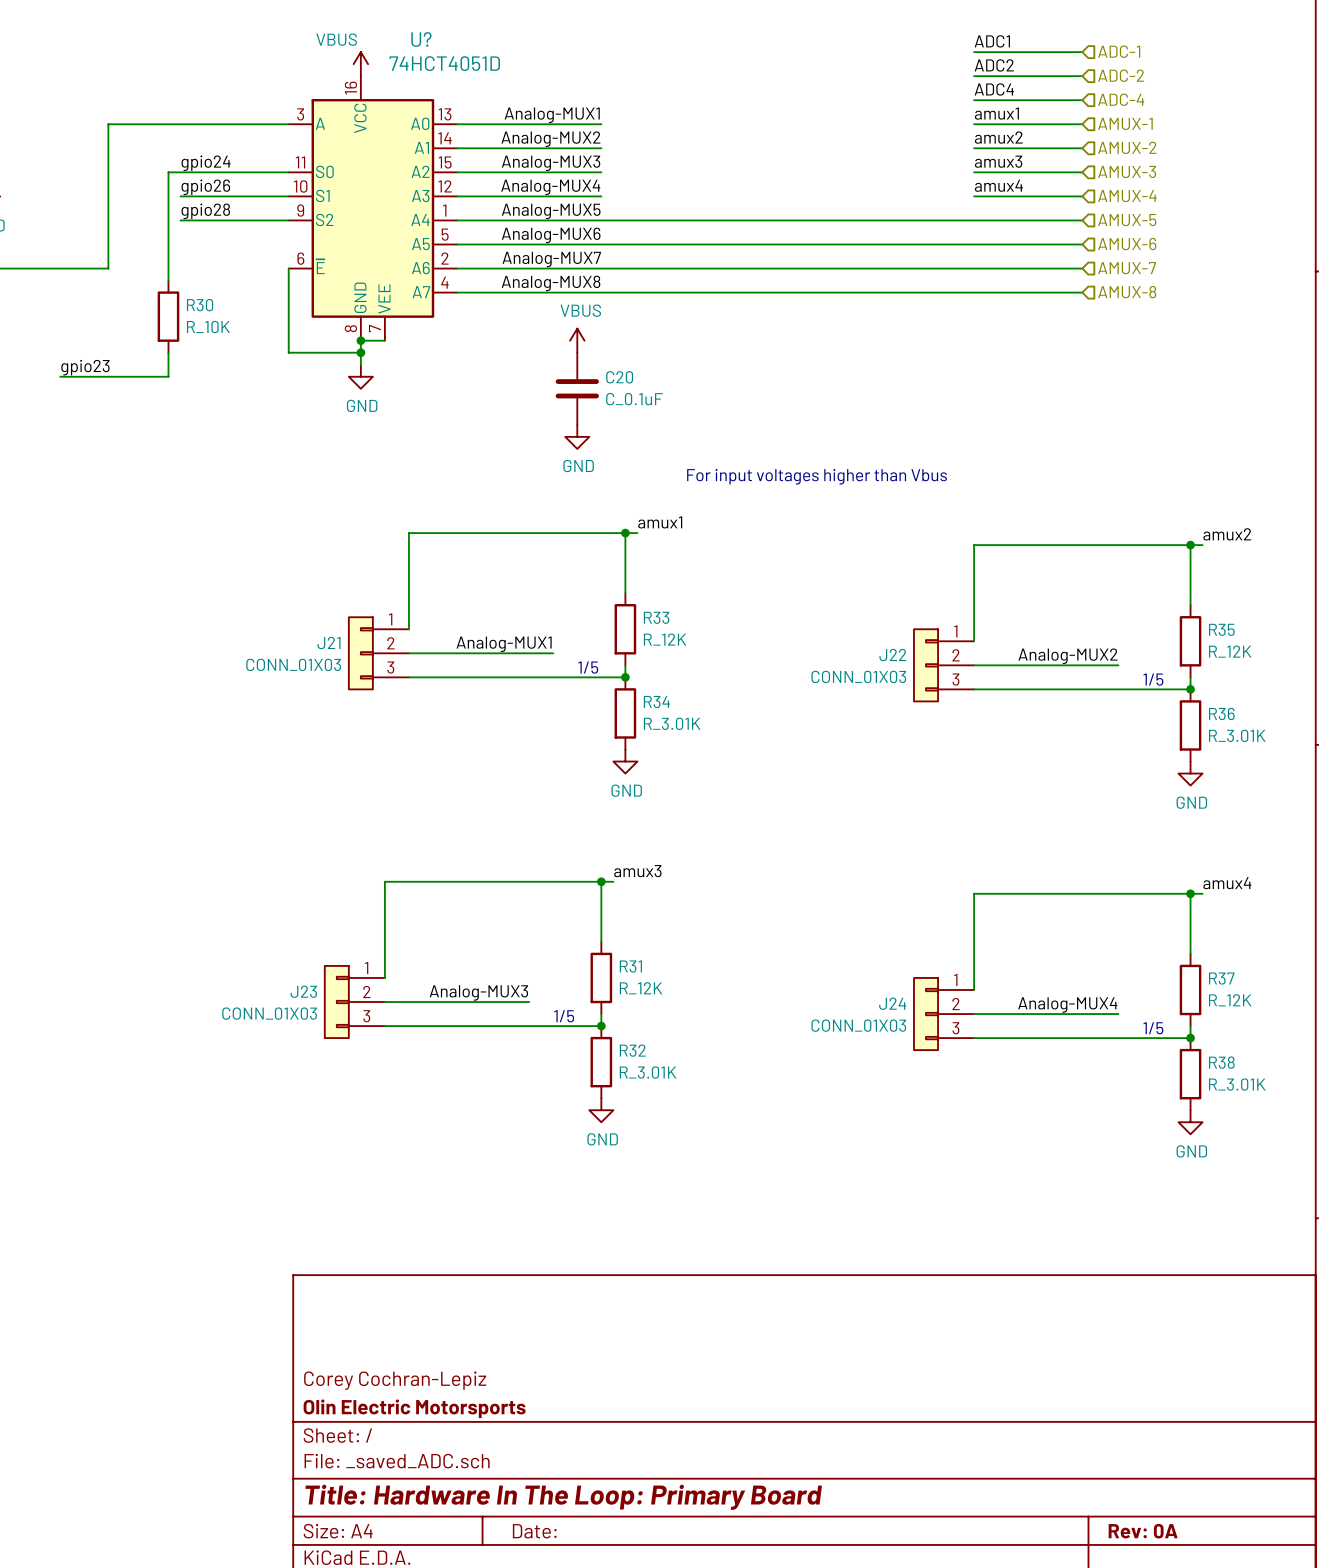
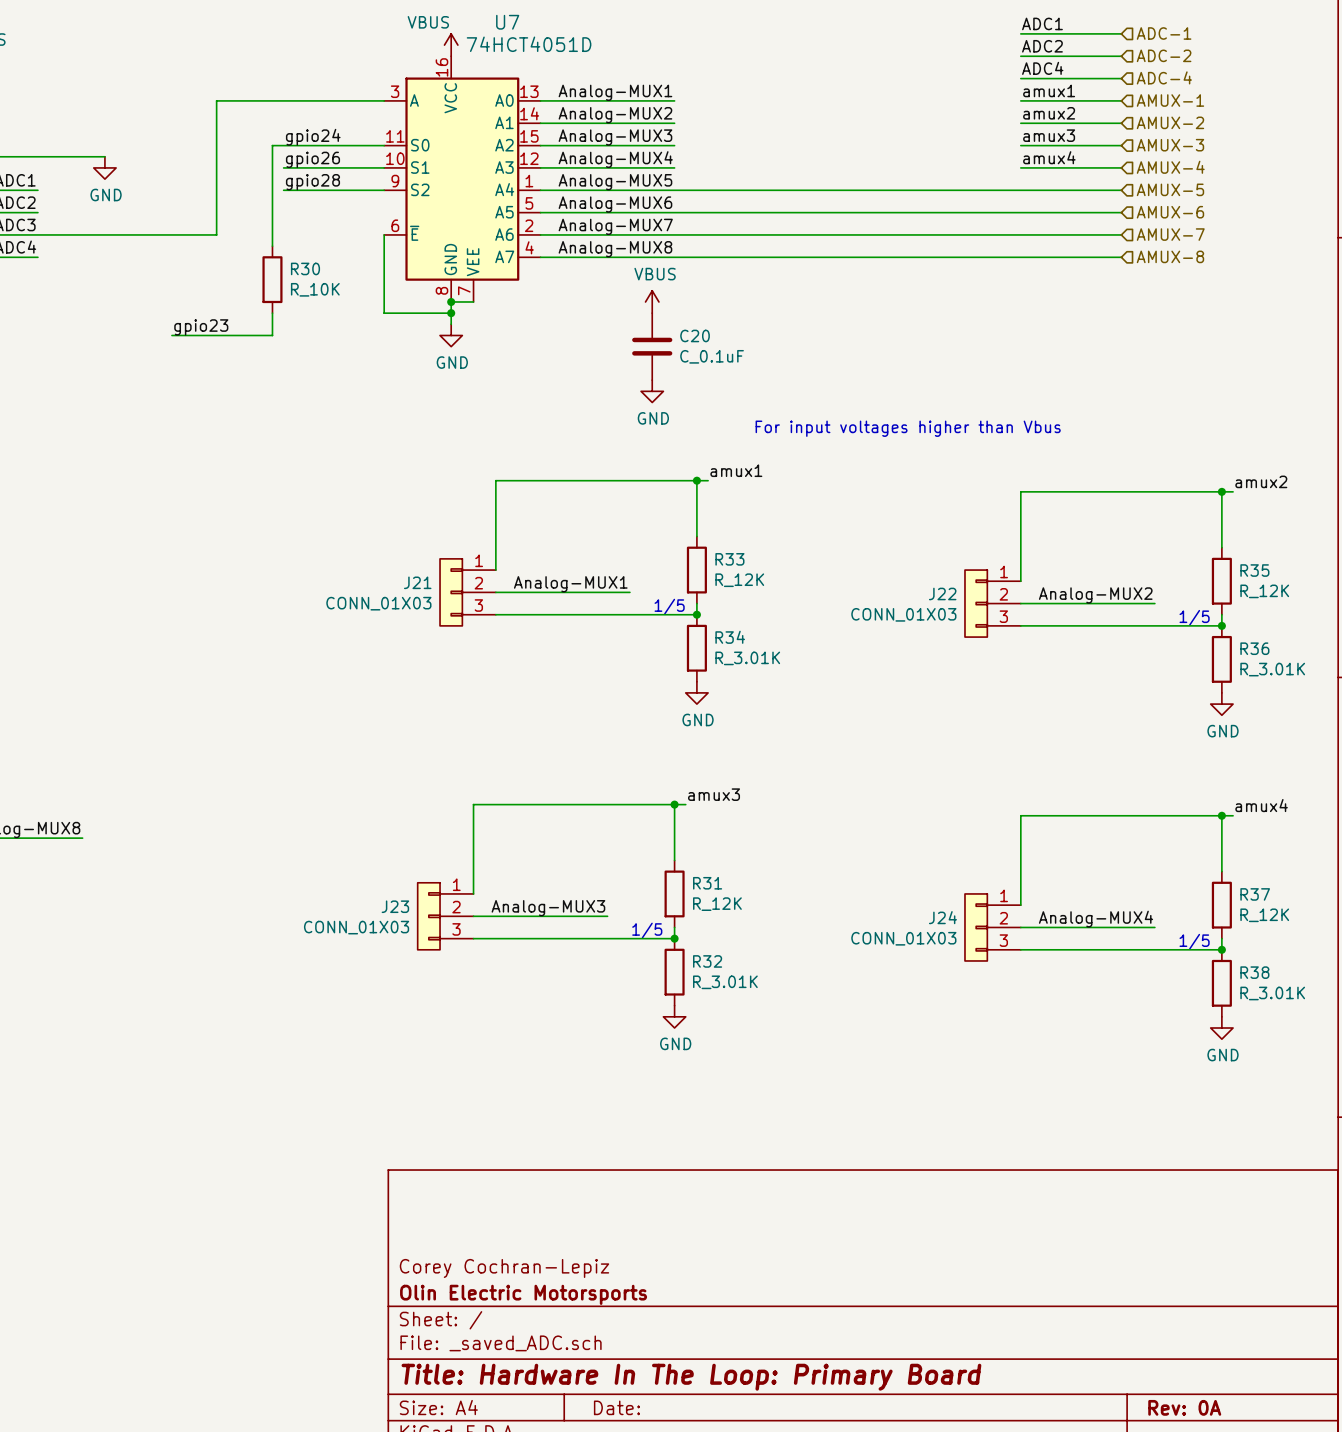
U? name: U? (421, 39) -> U7 (507, 22)

